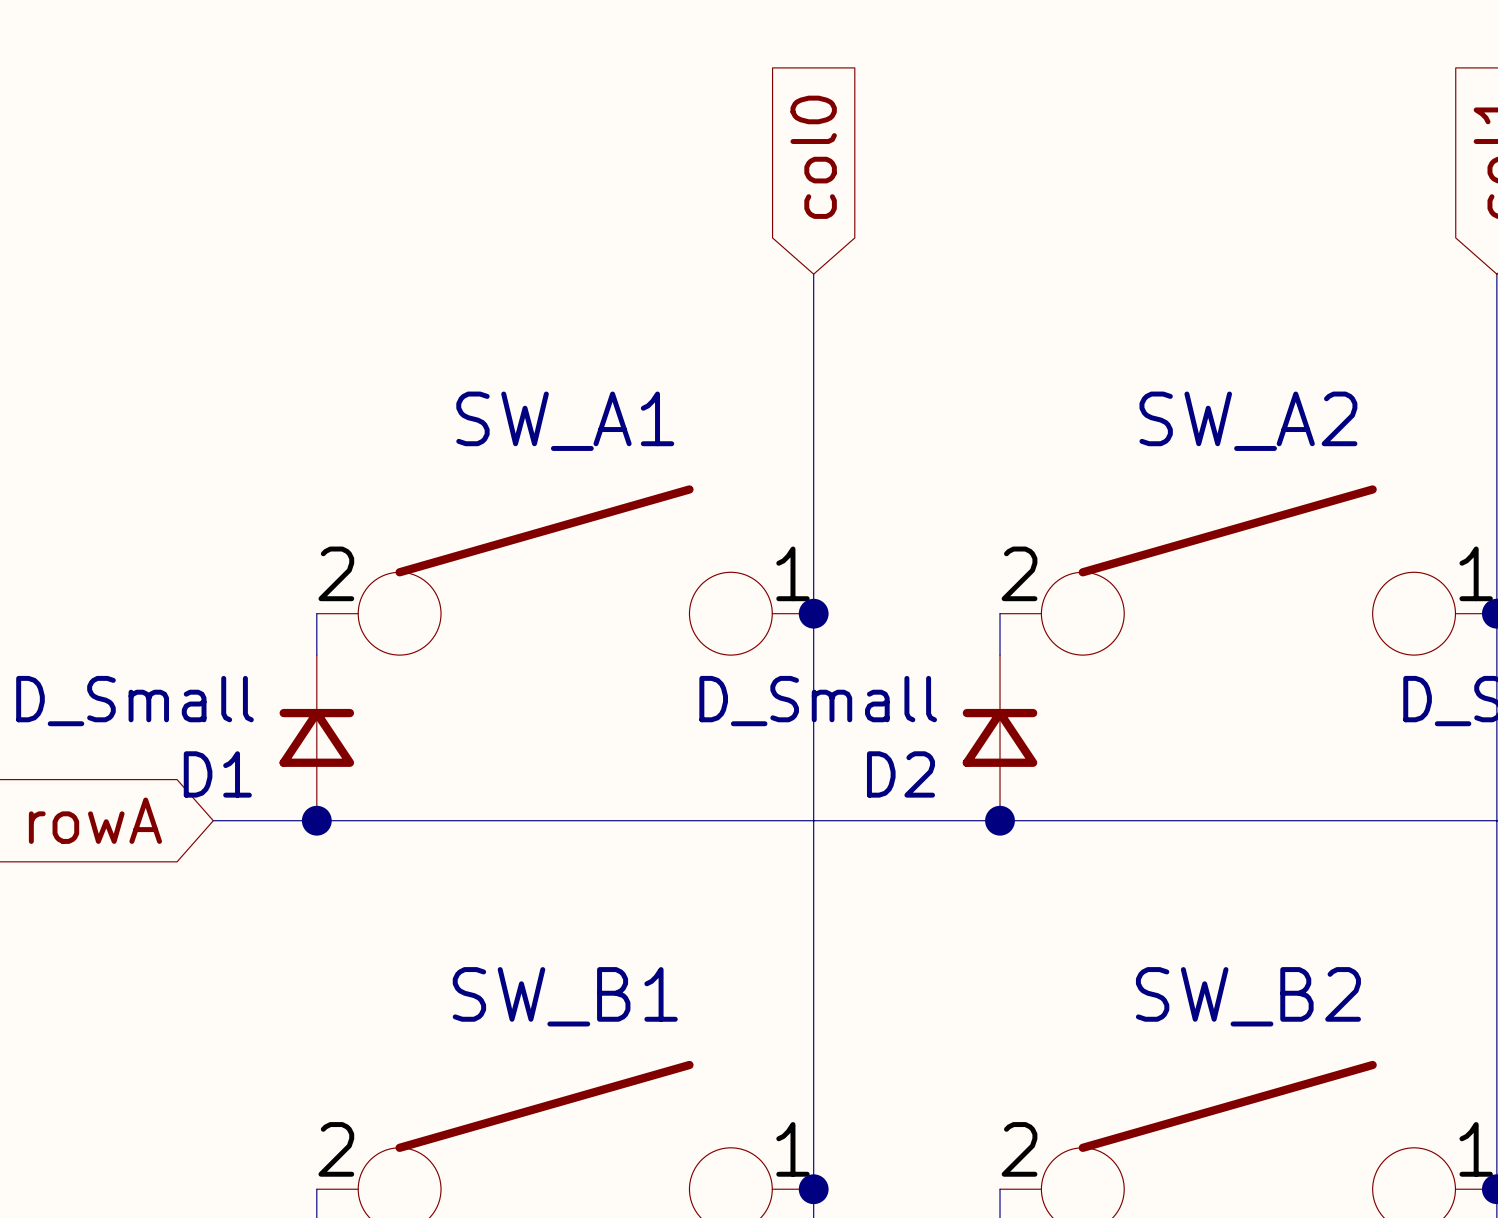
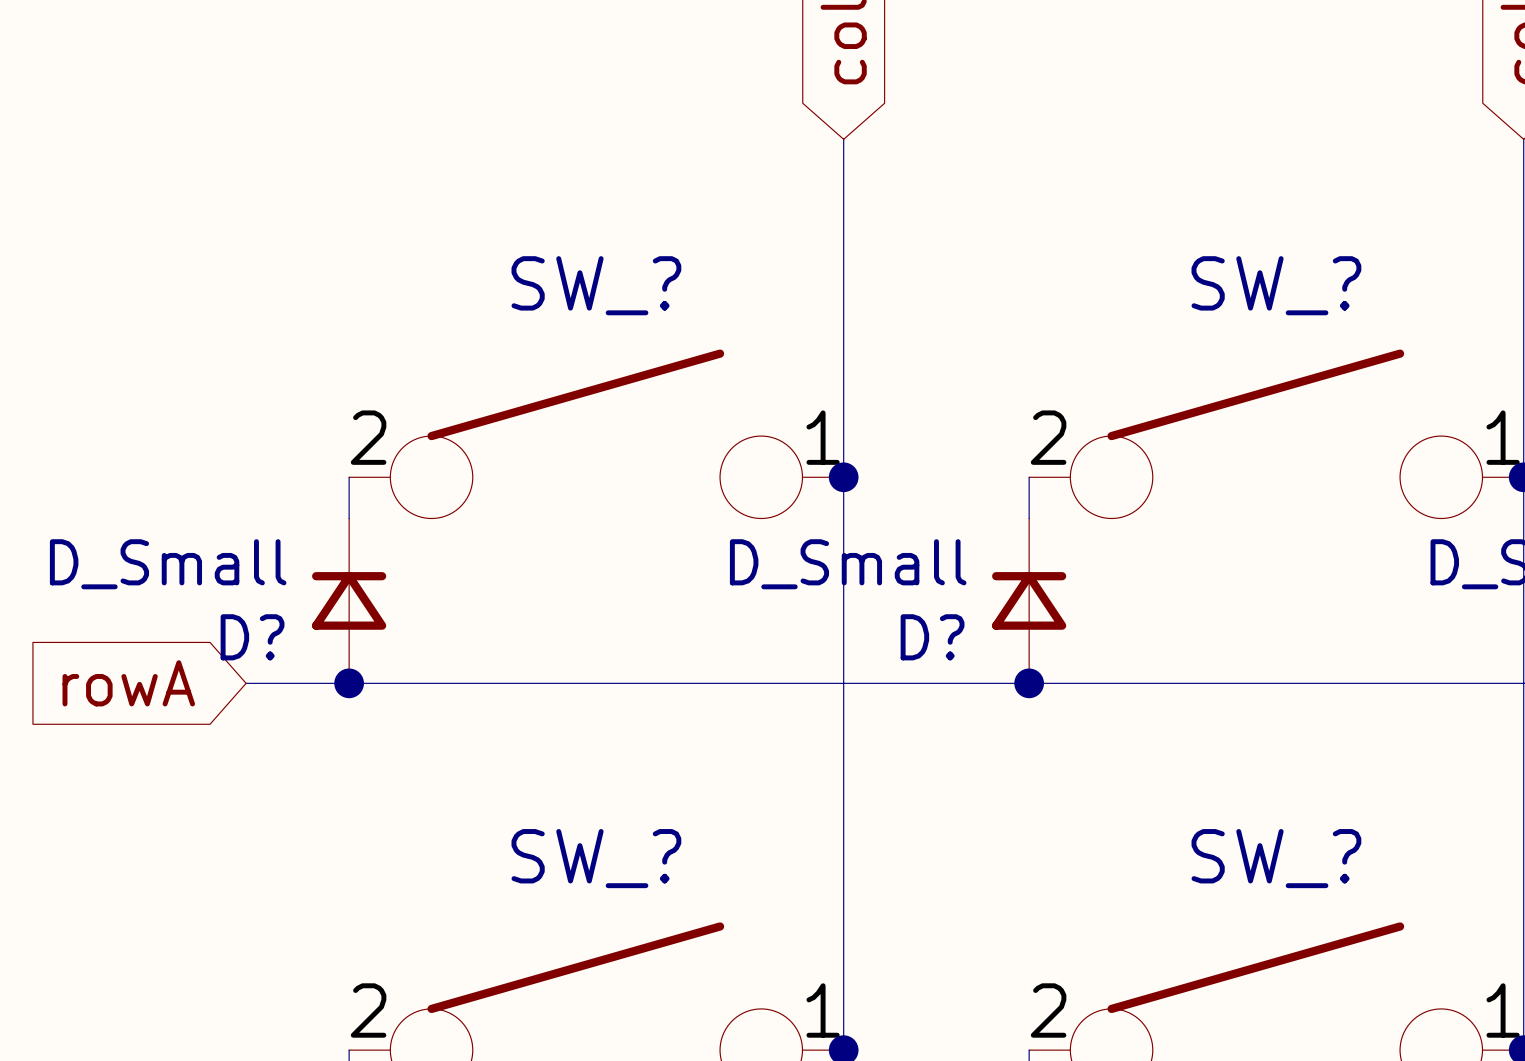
SW_A1 name: SW_A1 (565, 421) -> SW_? (596, 285)
SW_A2 name: SW_A2 (1248, 421) -> SW_? (1276, 285)
D1 name: D1 (217, 774) -> D? (252, 637)
D2 name: D2 (900, 774) -> D? (932, 637)
SW_B1 name: SW_B1 (565, 996) -> SW_? (596, 858)
SW_B2 name: SW_B2 (1248, 996) -> SW_? (1276, 858)

